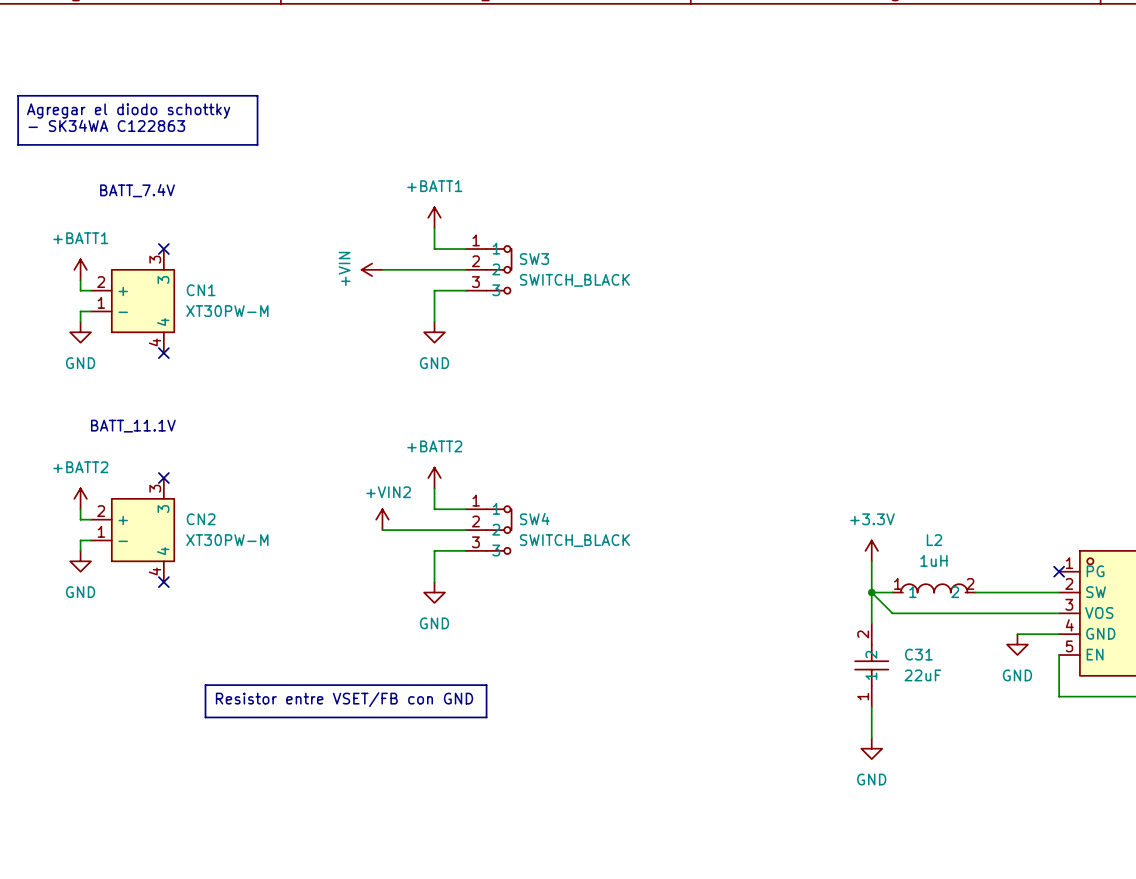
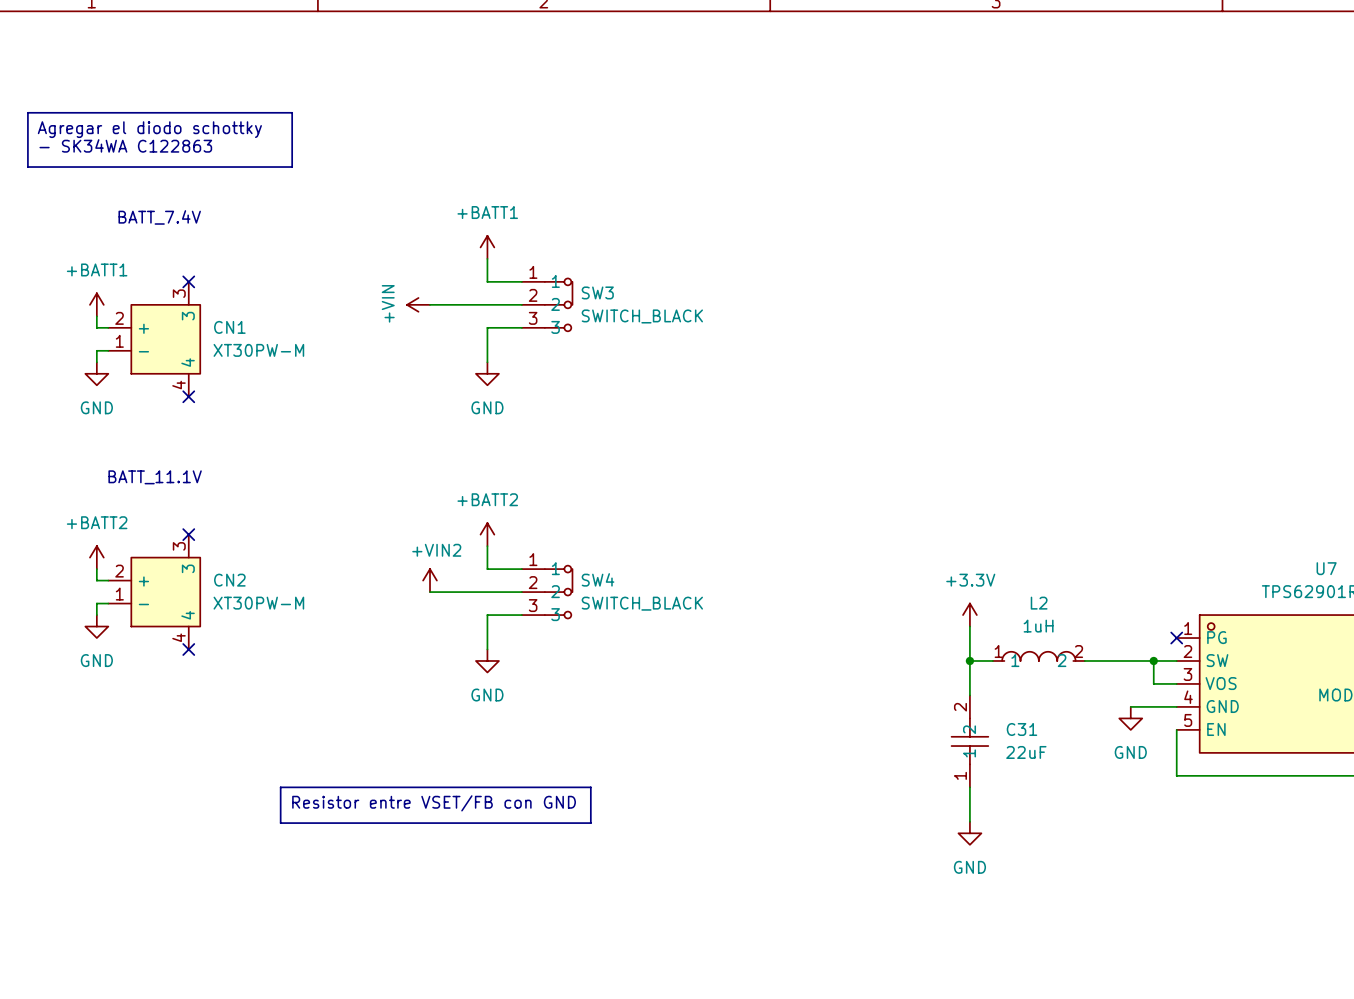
wire: (871, 592) (892, 613) (1038, 613) -> (1153, 660) (1153, 683)
junction: none -> (1153, 660)
line: (205, 685) (486, 685) (486, 717) (205, 717) (205, 685) -> (280, 787) (590, 787) (590, 823) (280, 823) (280, 787)
text position: Resistor entre VSET/FB con GND (344, 699) -> Resistor entre VSET/FB con GND (434, 803)

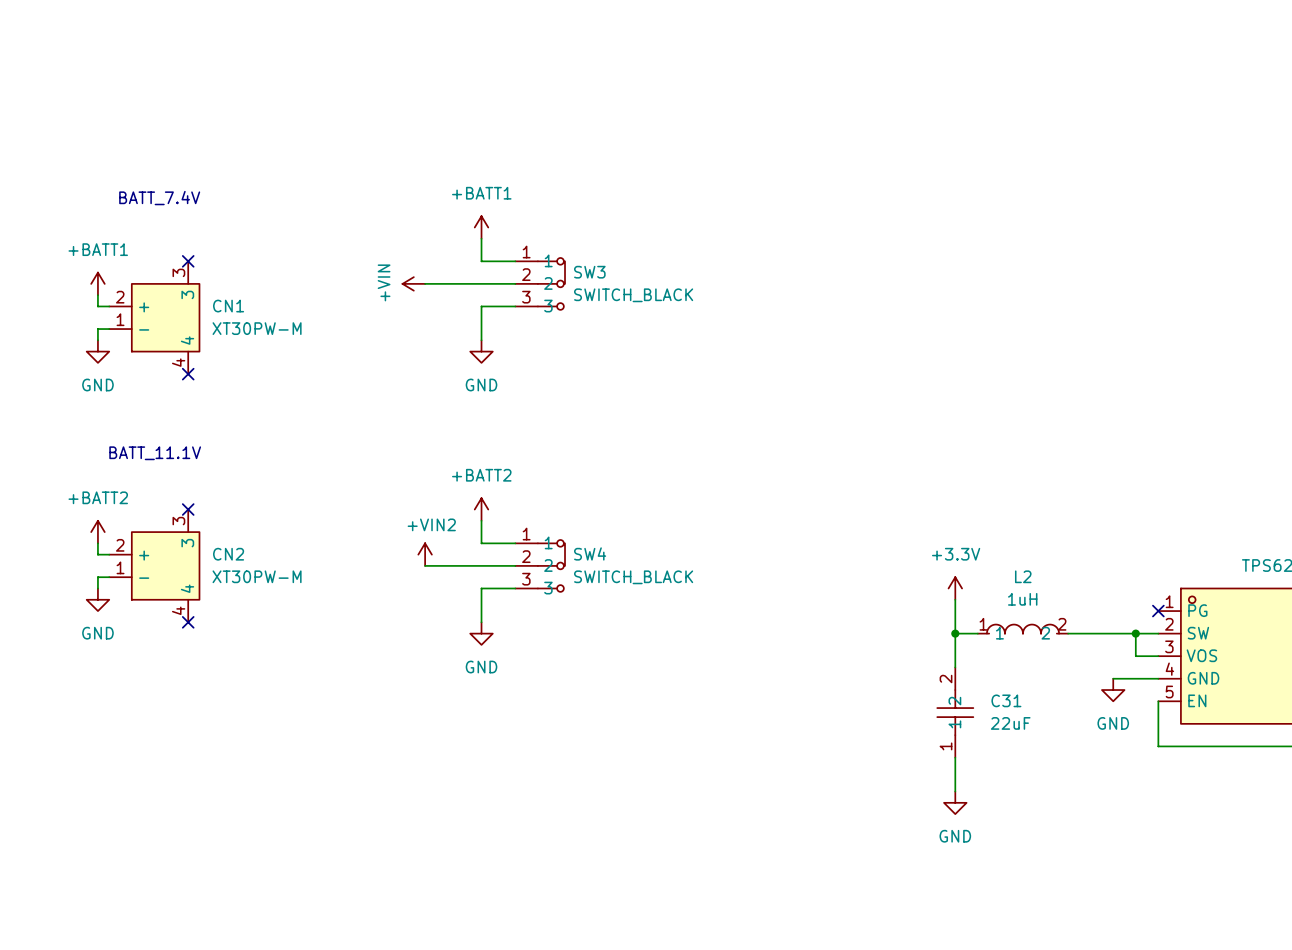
line: (27, 112) (292, 112) (292, 167) (27, 167) (27, 112) -> none
text: Agregar el diodo schottky (149, 129) -> none
text: - SK34WA C122863 (125, 145) -> none
line: (280, 787) (590, 787) (590, 823) (280, 823) (280, 787) -> none
text: Resistor entre VSET/FB con GND (434, 803) -> none

